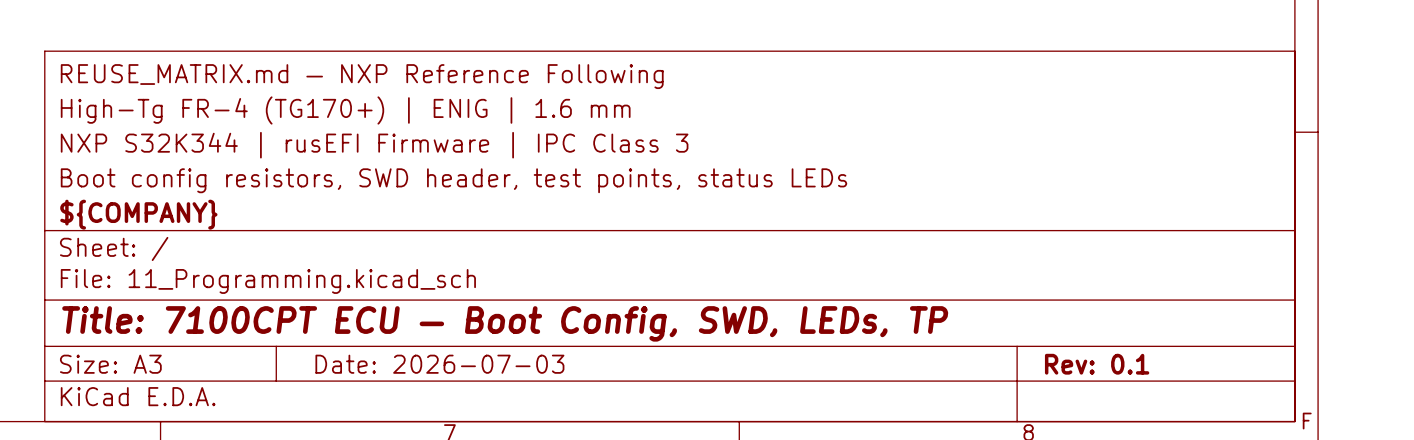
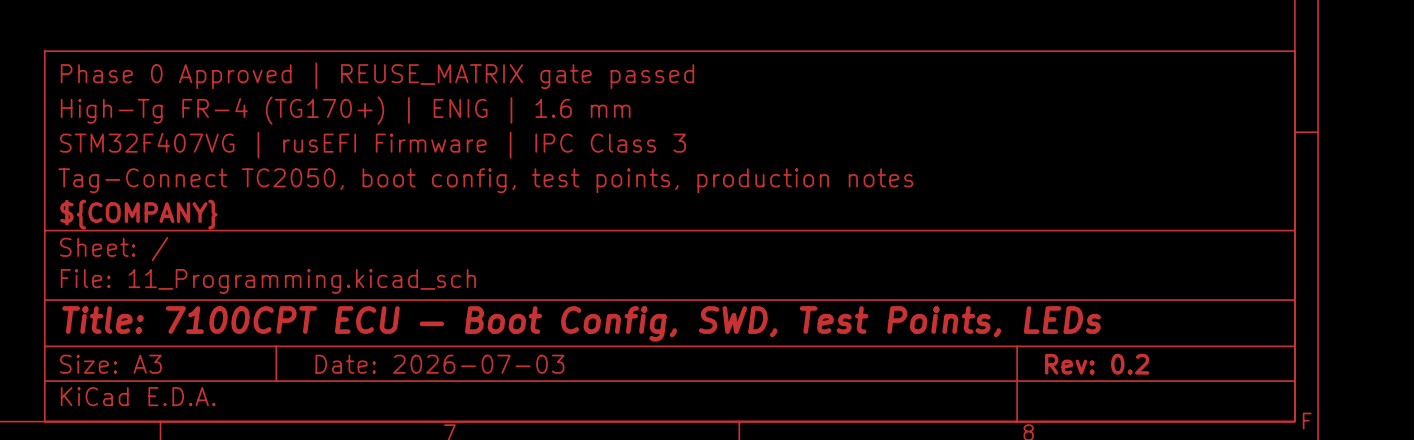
title block: REUSE_MATRIX.md — NXP Reference Following (362, 76) -> Phase 0 Approved | REUSE_MATRIX gate passed (377, 75)
title block: NXP S32K344 | rusEFI Firmware | IPC Class 3 (374, 145) -> STM32F407VG | rusEFI Firmware | IPC Class 3 (372, 145)
title block: Boot config resistors, SWD header, test points, status LEDs (453, 180) -> Tag-Connect TC2050, boot config, test points, production notes (485, 180)
title block: Title: 7100CPT ECU — Boot Config, SWD, LEDs, TP (505, 323) -> Title: 7100CPT ECU — Boot Config, SWD, Test Points, LEDs (581, 323)
title block: Rev: 0.1 (1097, 364) -> Rev: 0.2 (1097, 364)

